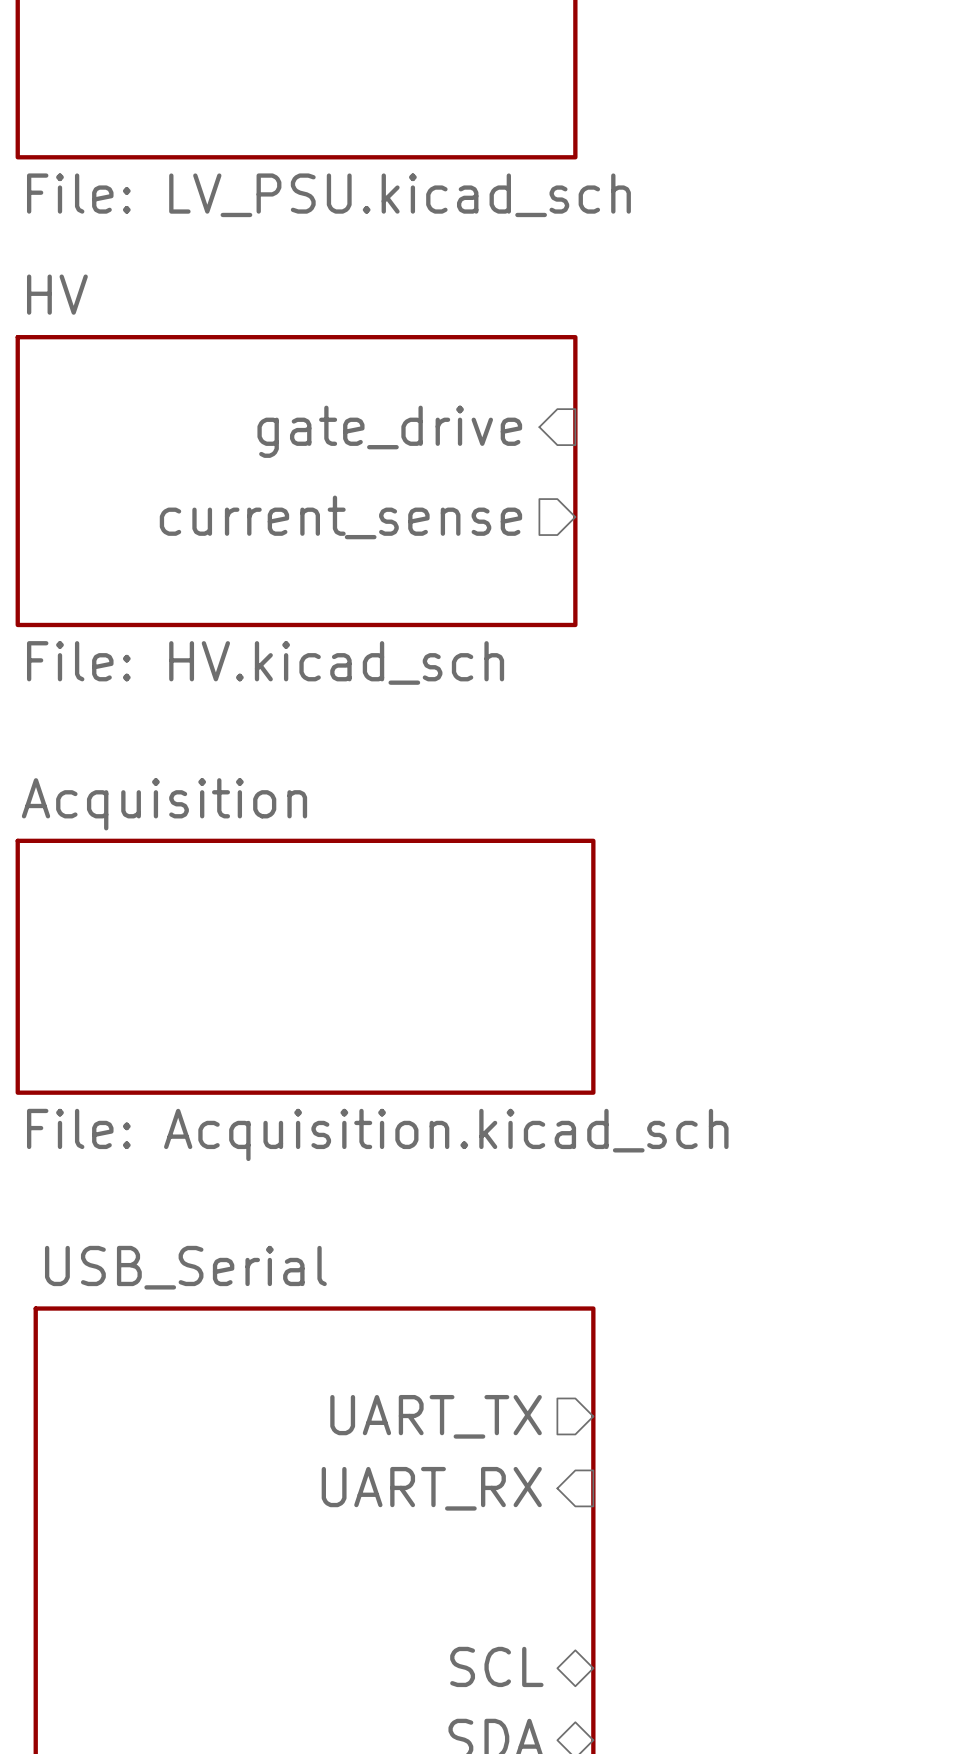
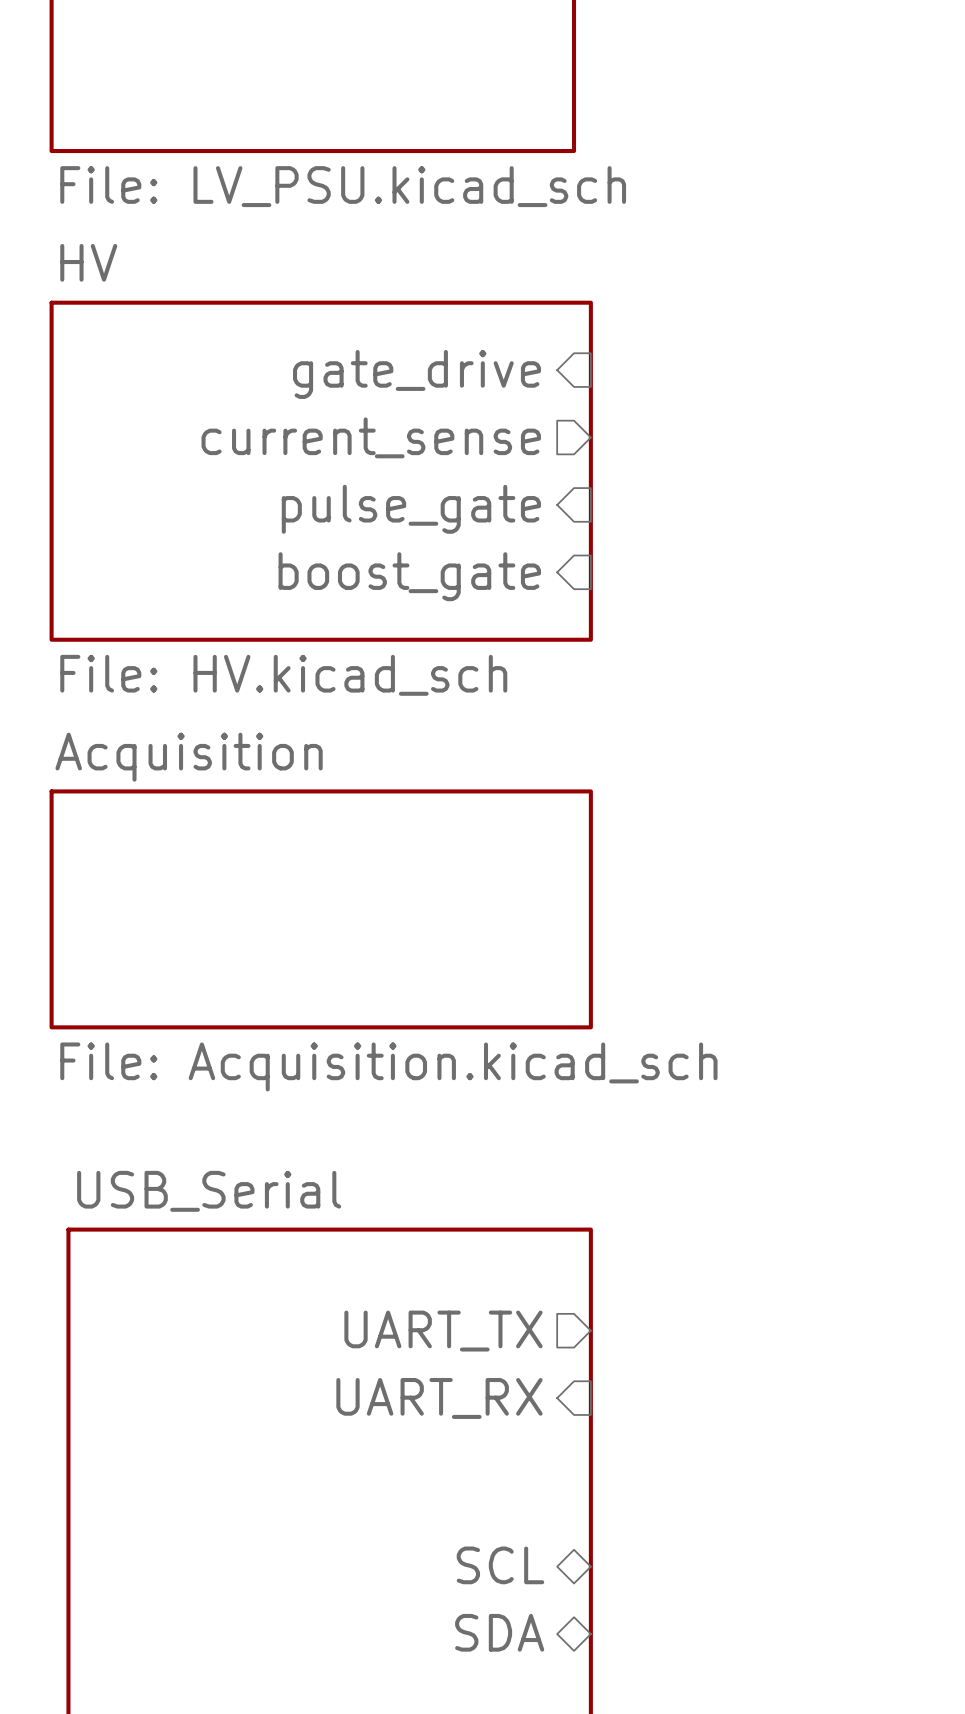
sheet HV shape: [15, 335, 578, 628] -> [49, 300, 593, 642]
sheet pin position: gate_drive (389, 431) -> gate_drive (417, 374)
sheet pin position: current_sense (340, 517) -> current_sense (371, 437)
sheet pin: none -> pulse_gate (411, 509)
sheet pin: none -> boost_gate (409, 576)

